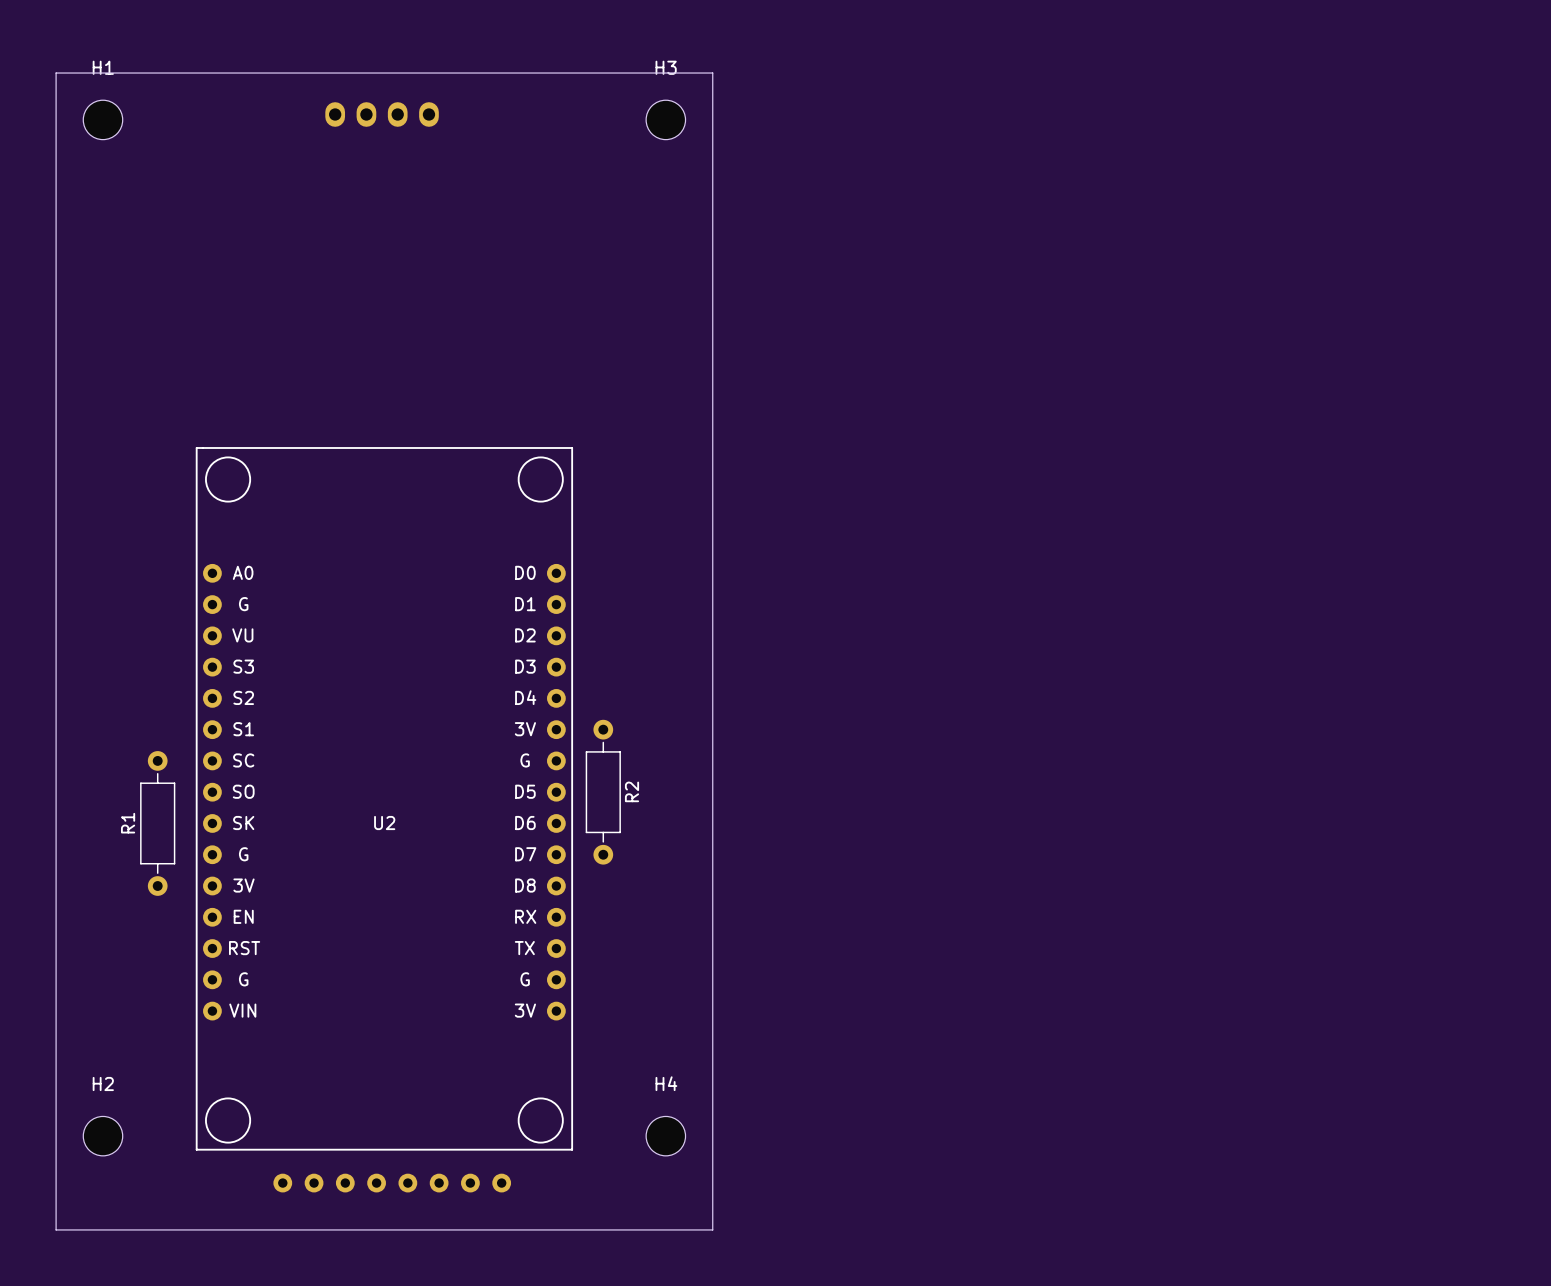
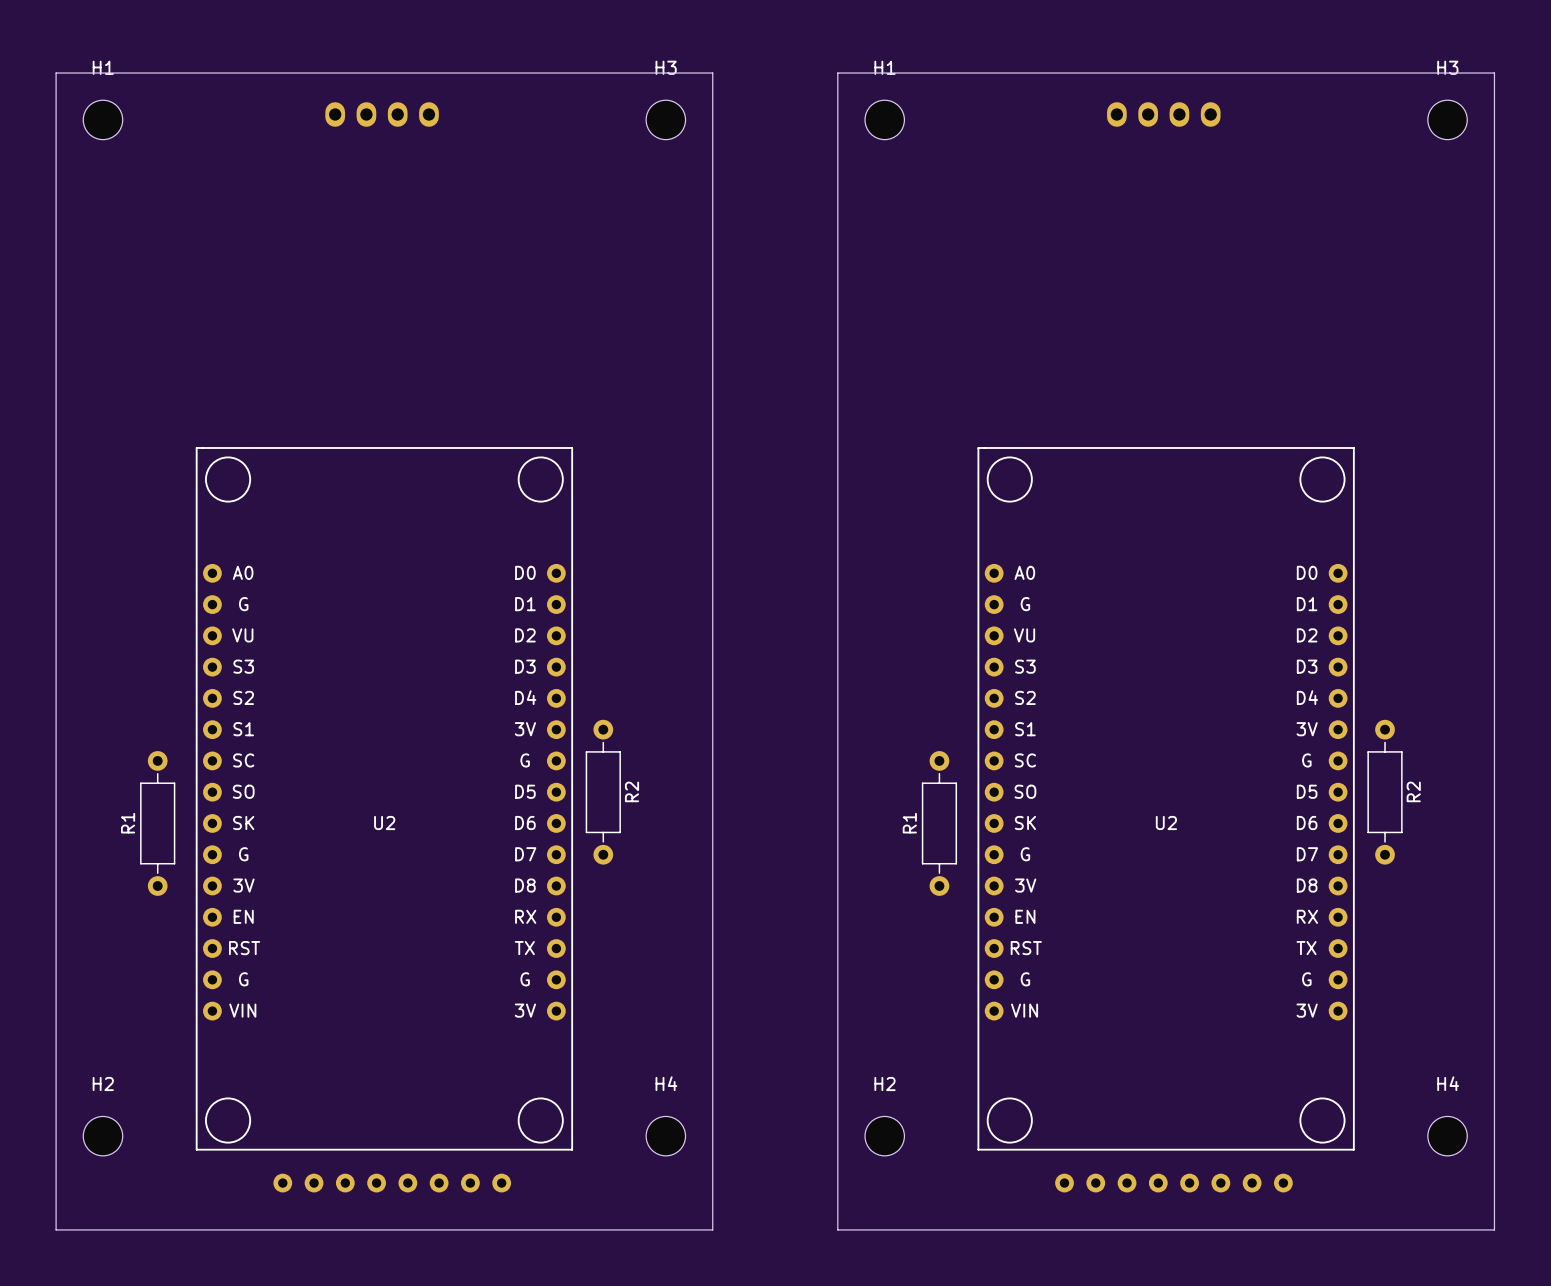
board edge: none -> (837, 73) (1494, 73) (1494, 1229) (837, 1229) (837, 73)
part: none -> (1163, 114)
H1: none -> (884, 119)
H3: none -> (1447, 119)
R2: none -> (1385, 792)
U2: none -> (1166, 798)
R1: none -> (939, 823)
H2: none -> (884, 1136)
H4: none -> (1447, 1136)
part: none -> (1173, 1183)

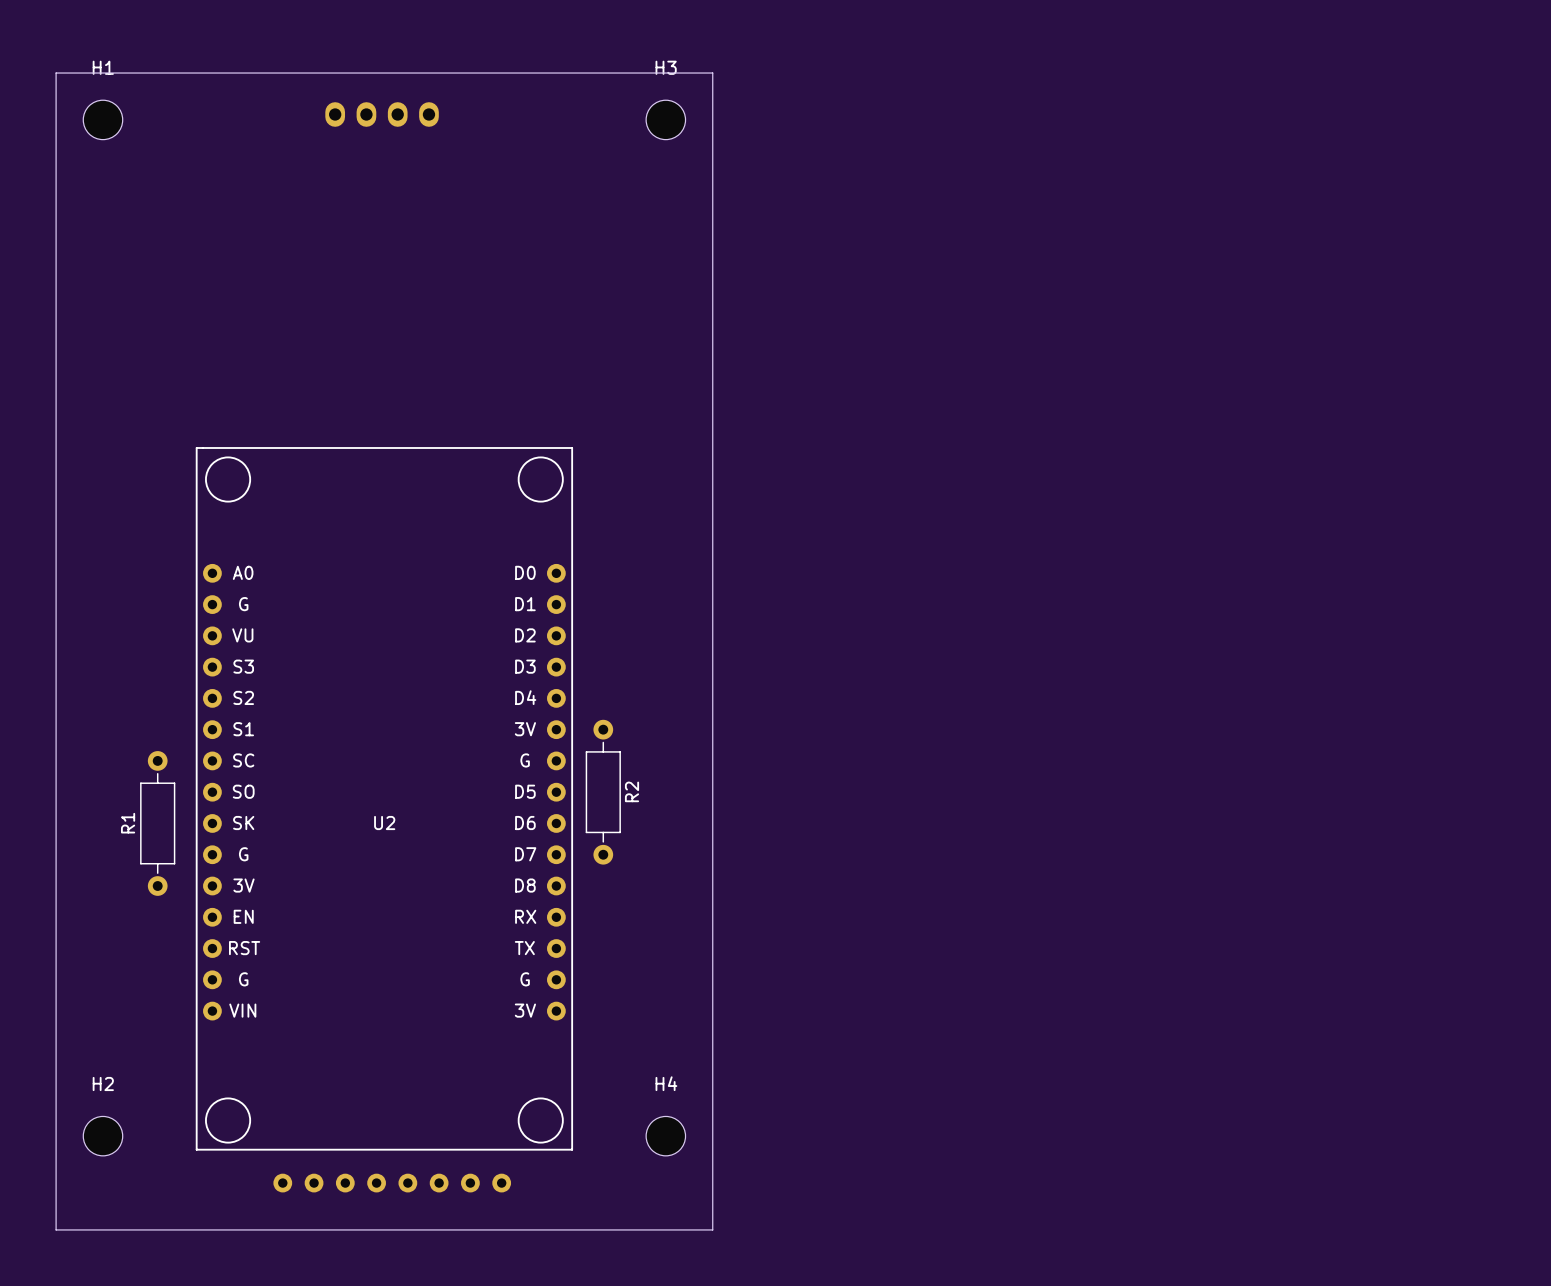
board edge: (837, 73) (1494, 73) (1494, 1229) (837, 1229) (837, 73) -> none
part: (1163, 114) -> none
H1: (884, 119) -> none
H3: (1447, 119) -> none
R2: (1385, 792) -> none
U2: (1166, 798) -> none
R1: (939, 823) -> none
H2: (884, 1136) -> none
H4: (1447, 1136) -> none
part: (1173, 1183) -> none

